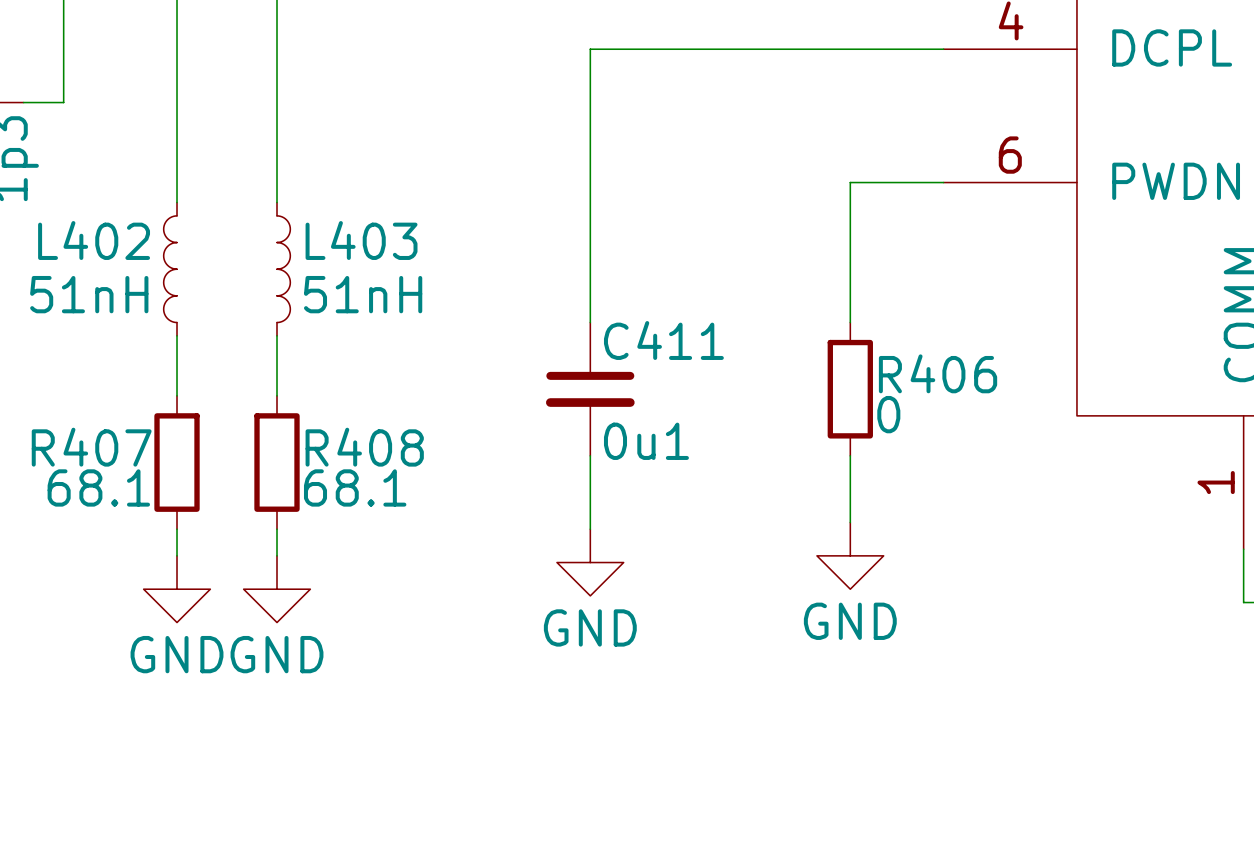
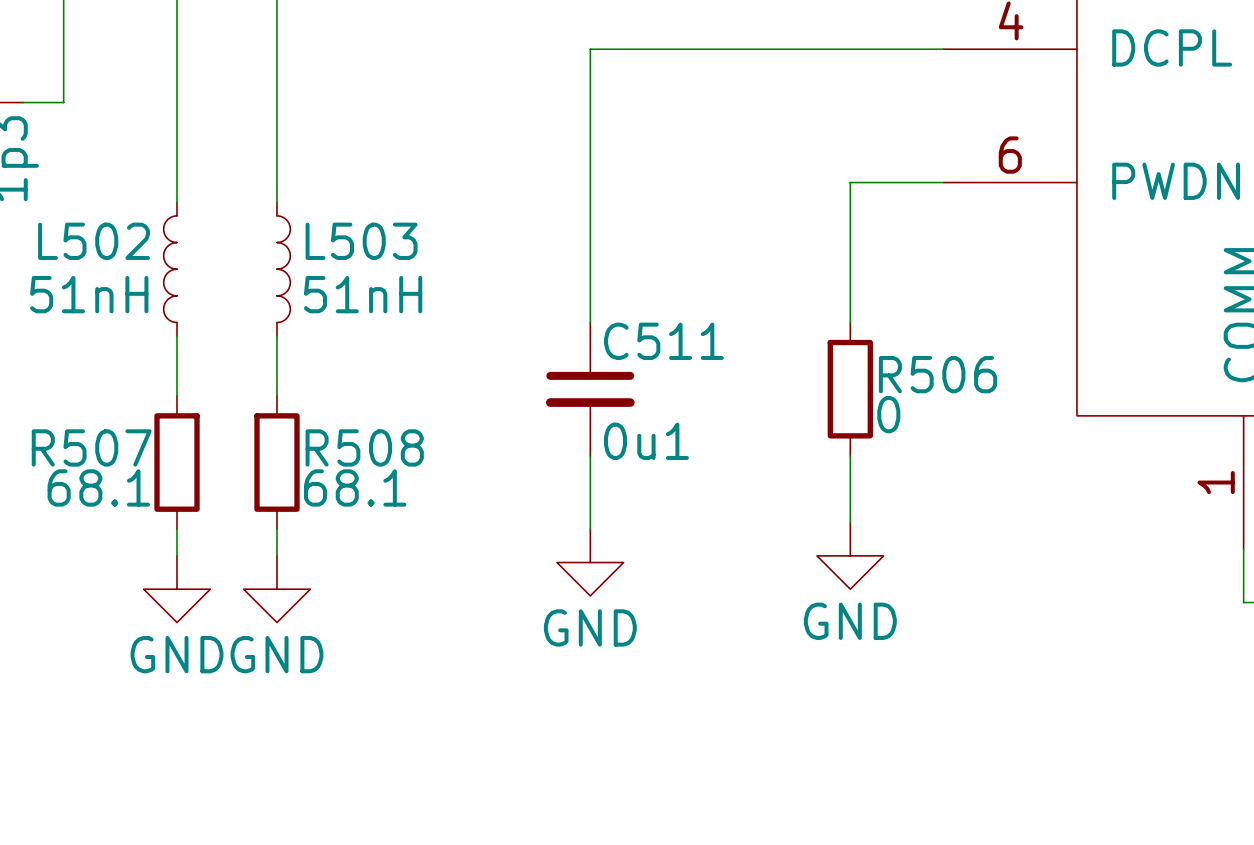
L402 name: L402 (94, 240) -> L502 (94, 241)
L403 name: L403 (361, 240) -> L503 (361, 241)
C411 name: C411 (663, 340) -> C511 (663, 341)
R406 name: R406 (938, 373) -> R506 (938, 374)
R407 name: R407 (91, 447) -> R507 (91, 447)
R408 name: R408 (364, 447) -> R508 (364, 447)

